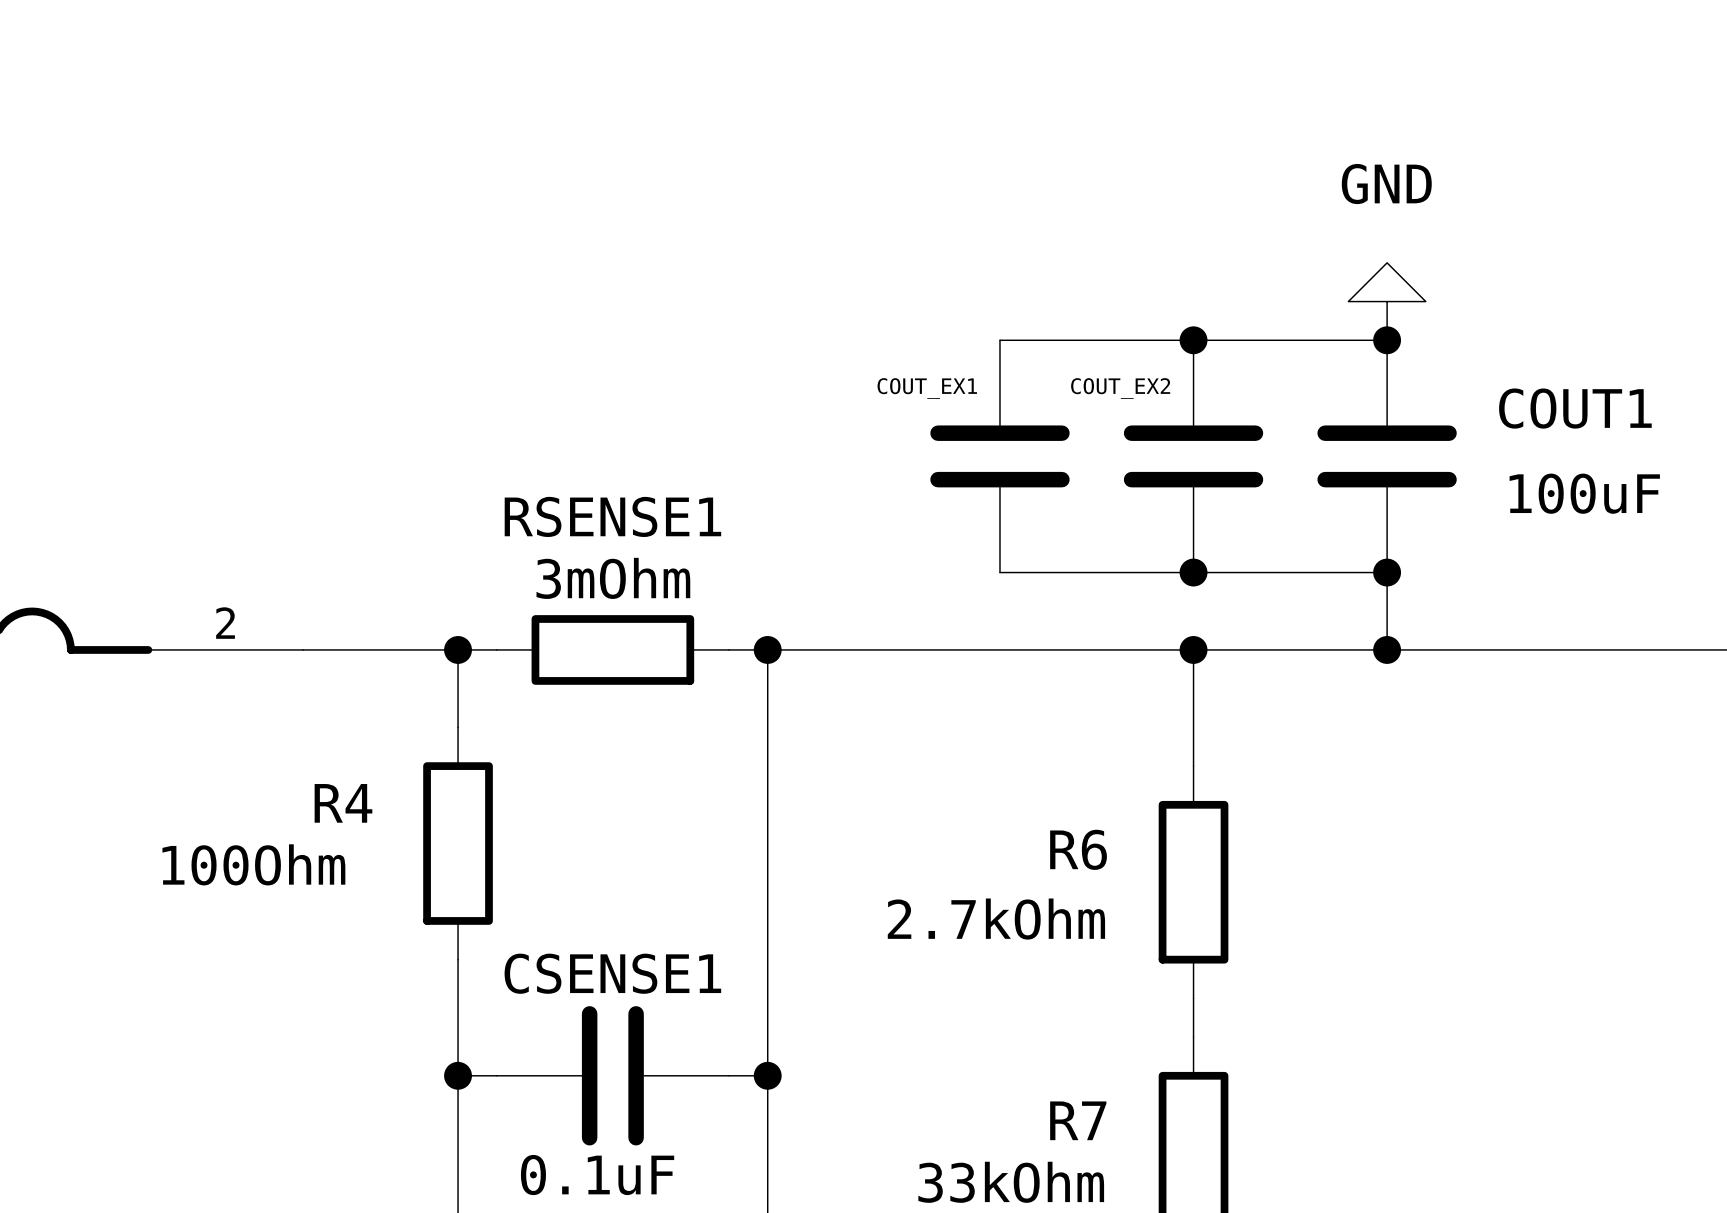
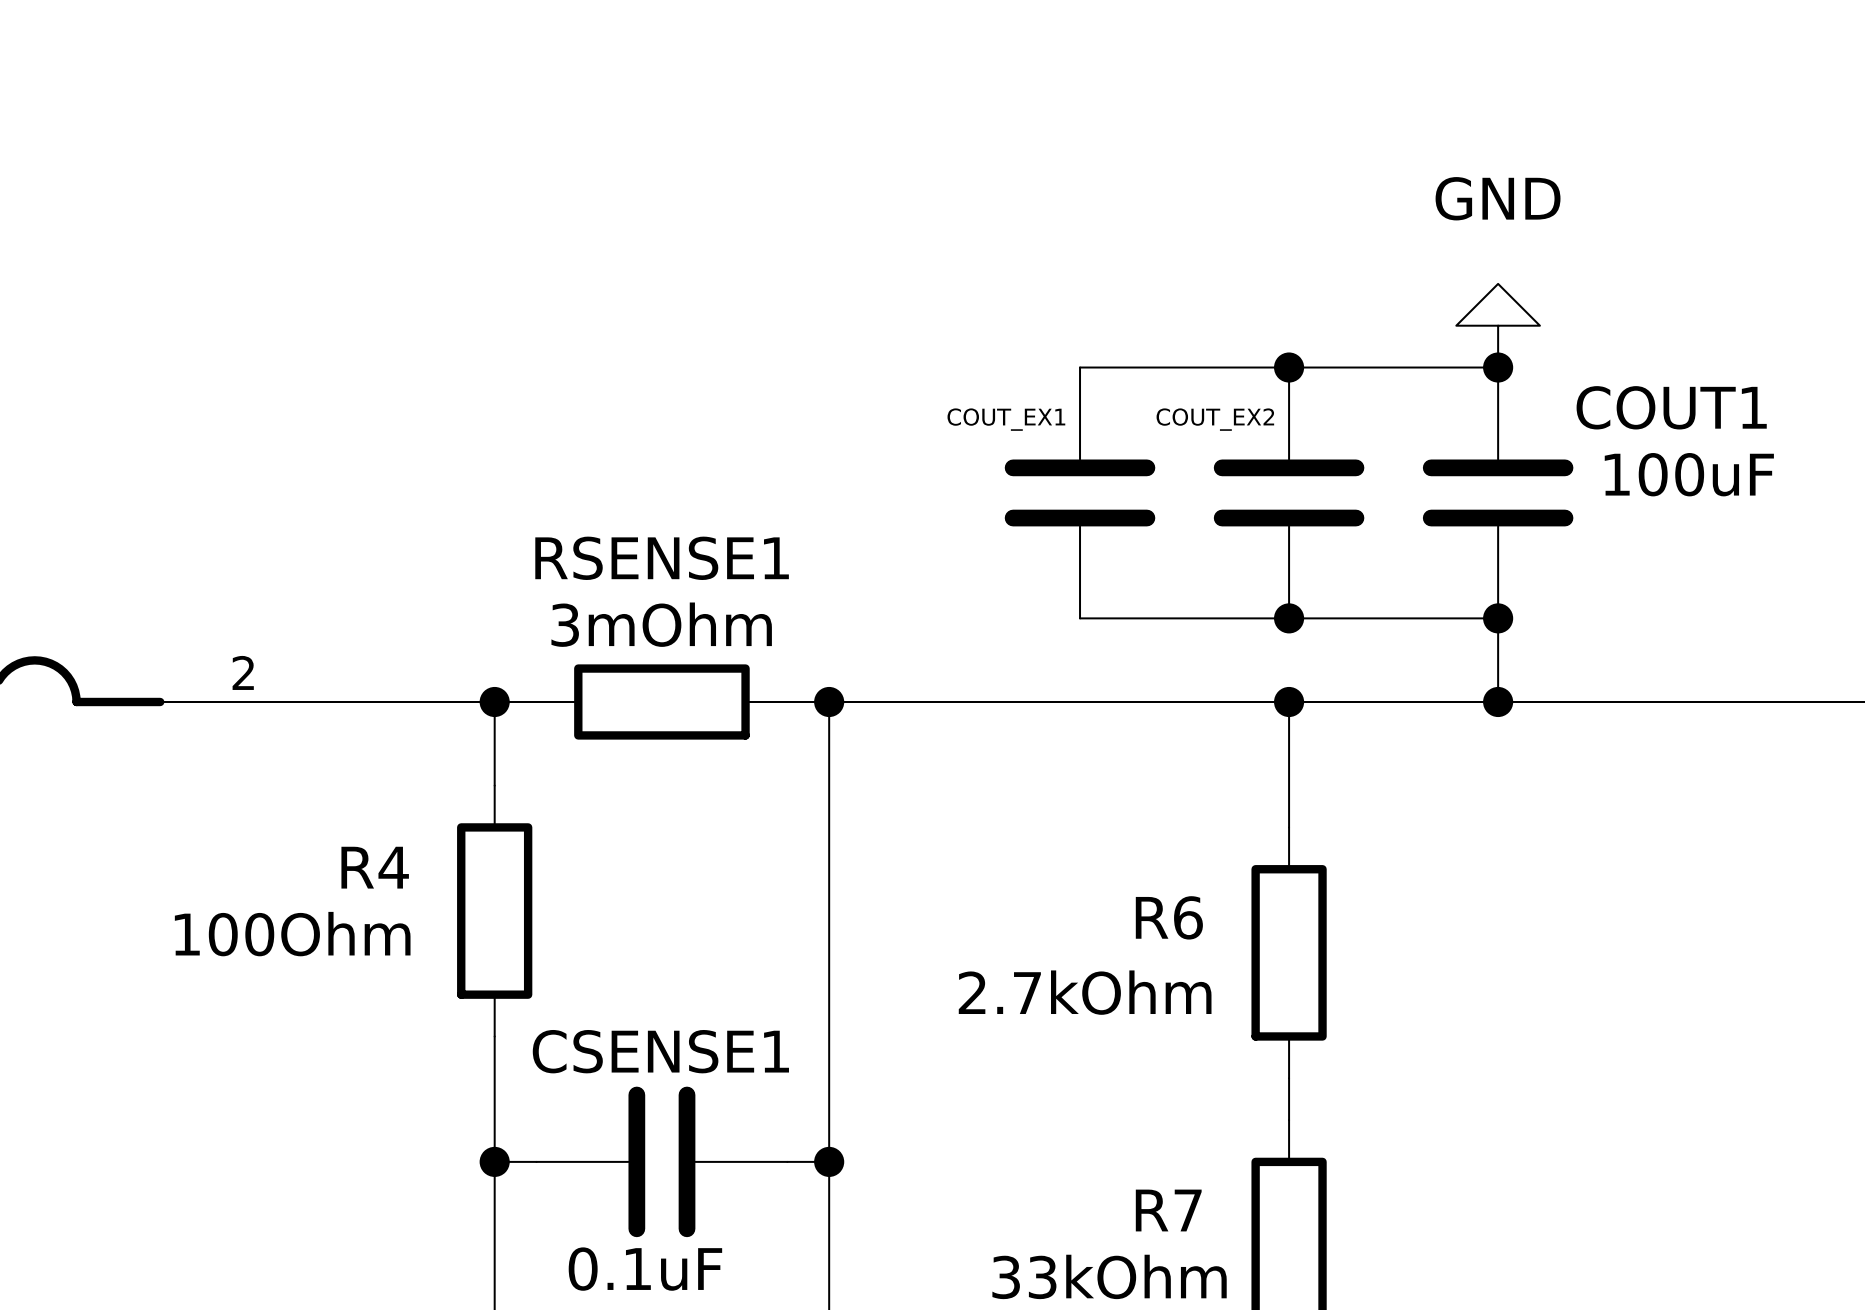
COUT1 name position: COUT1 (1575, 408) -> COUT1 (1671, 407)
COUT1 value position: 100uF (1584, 493) -> 100uF (1689, 474)

